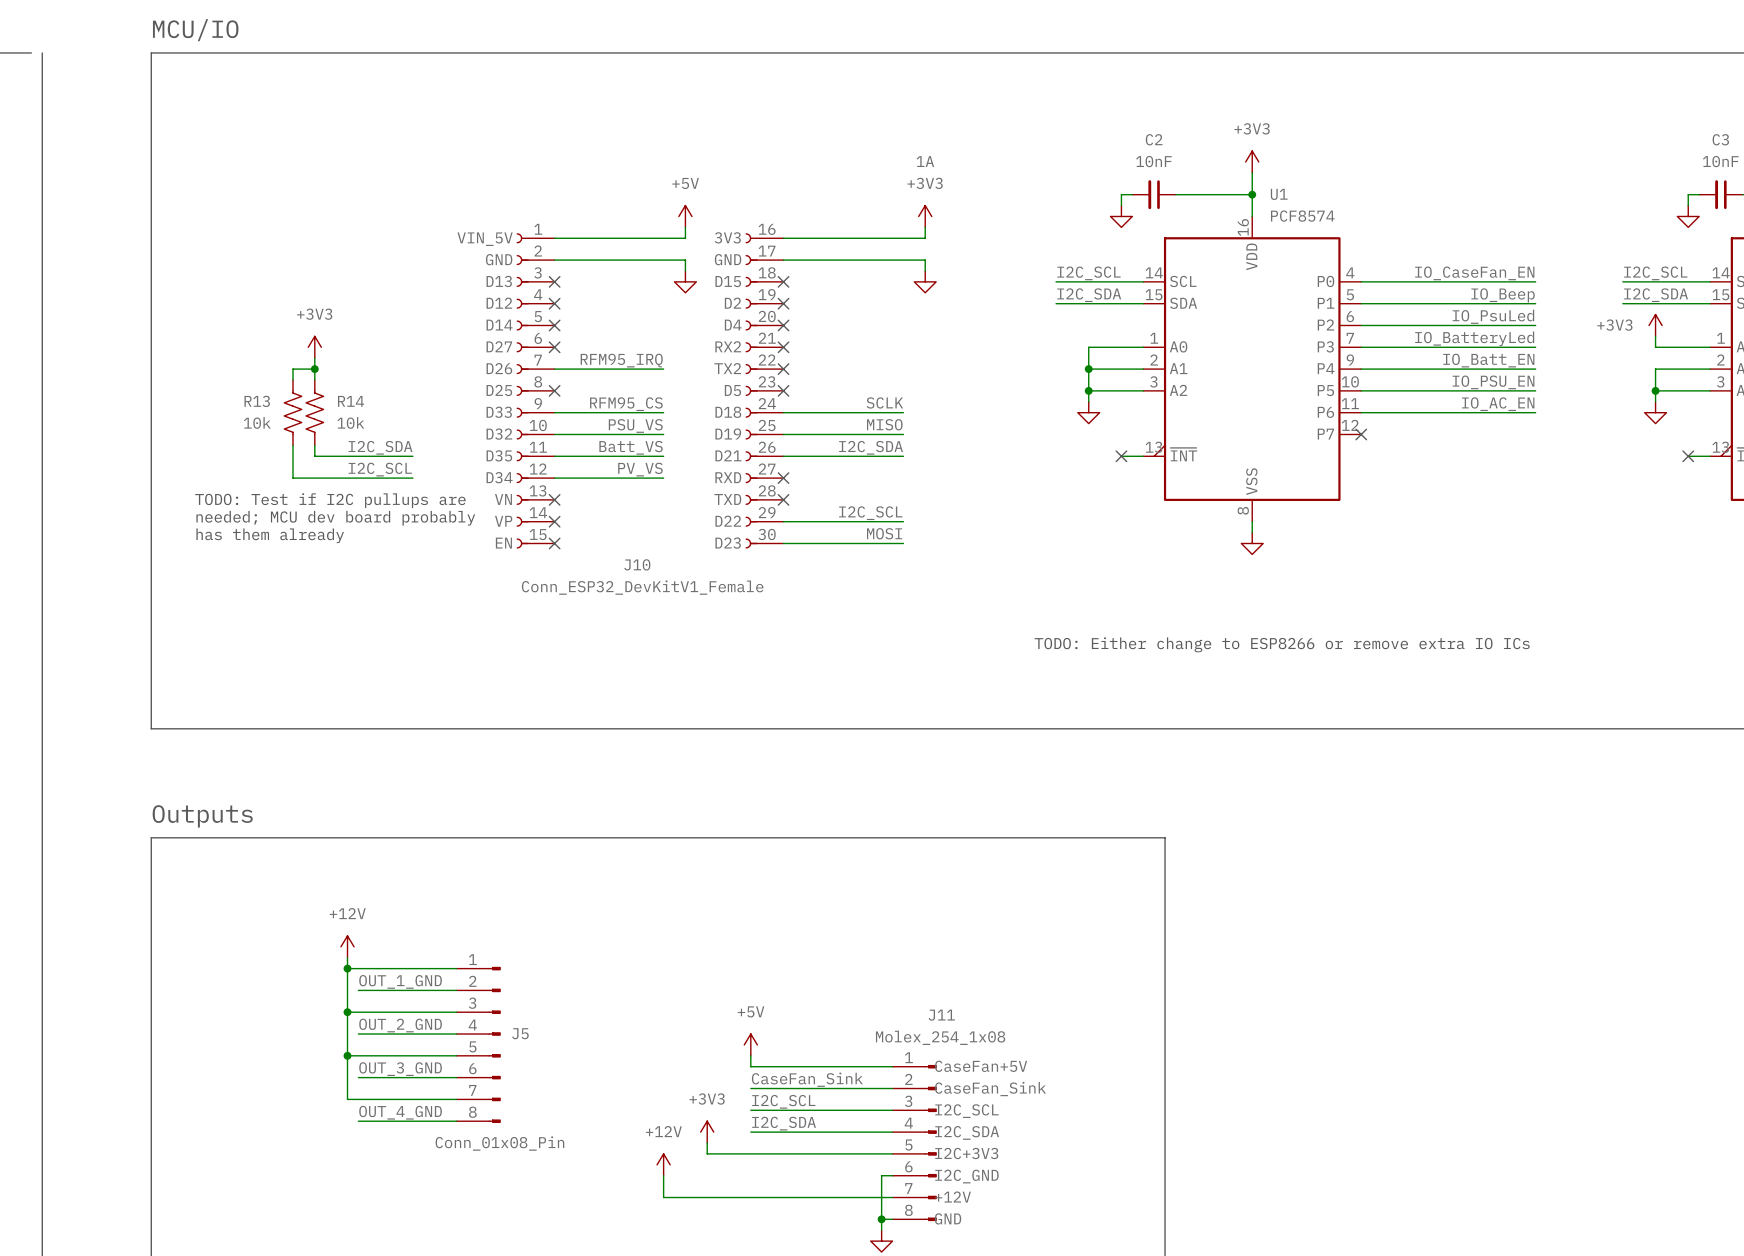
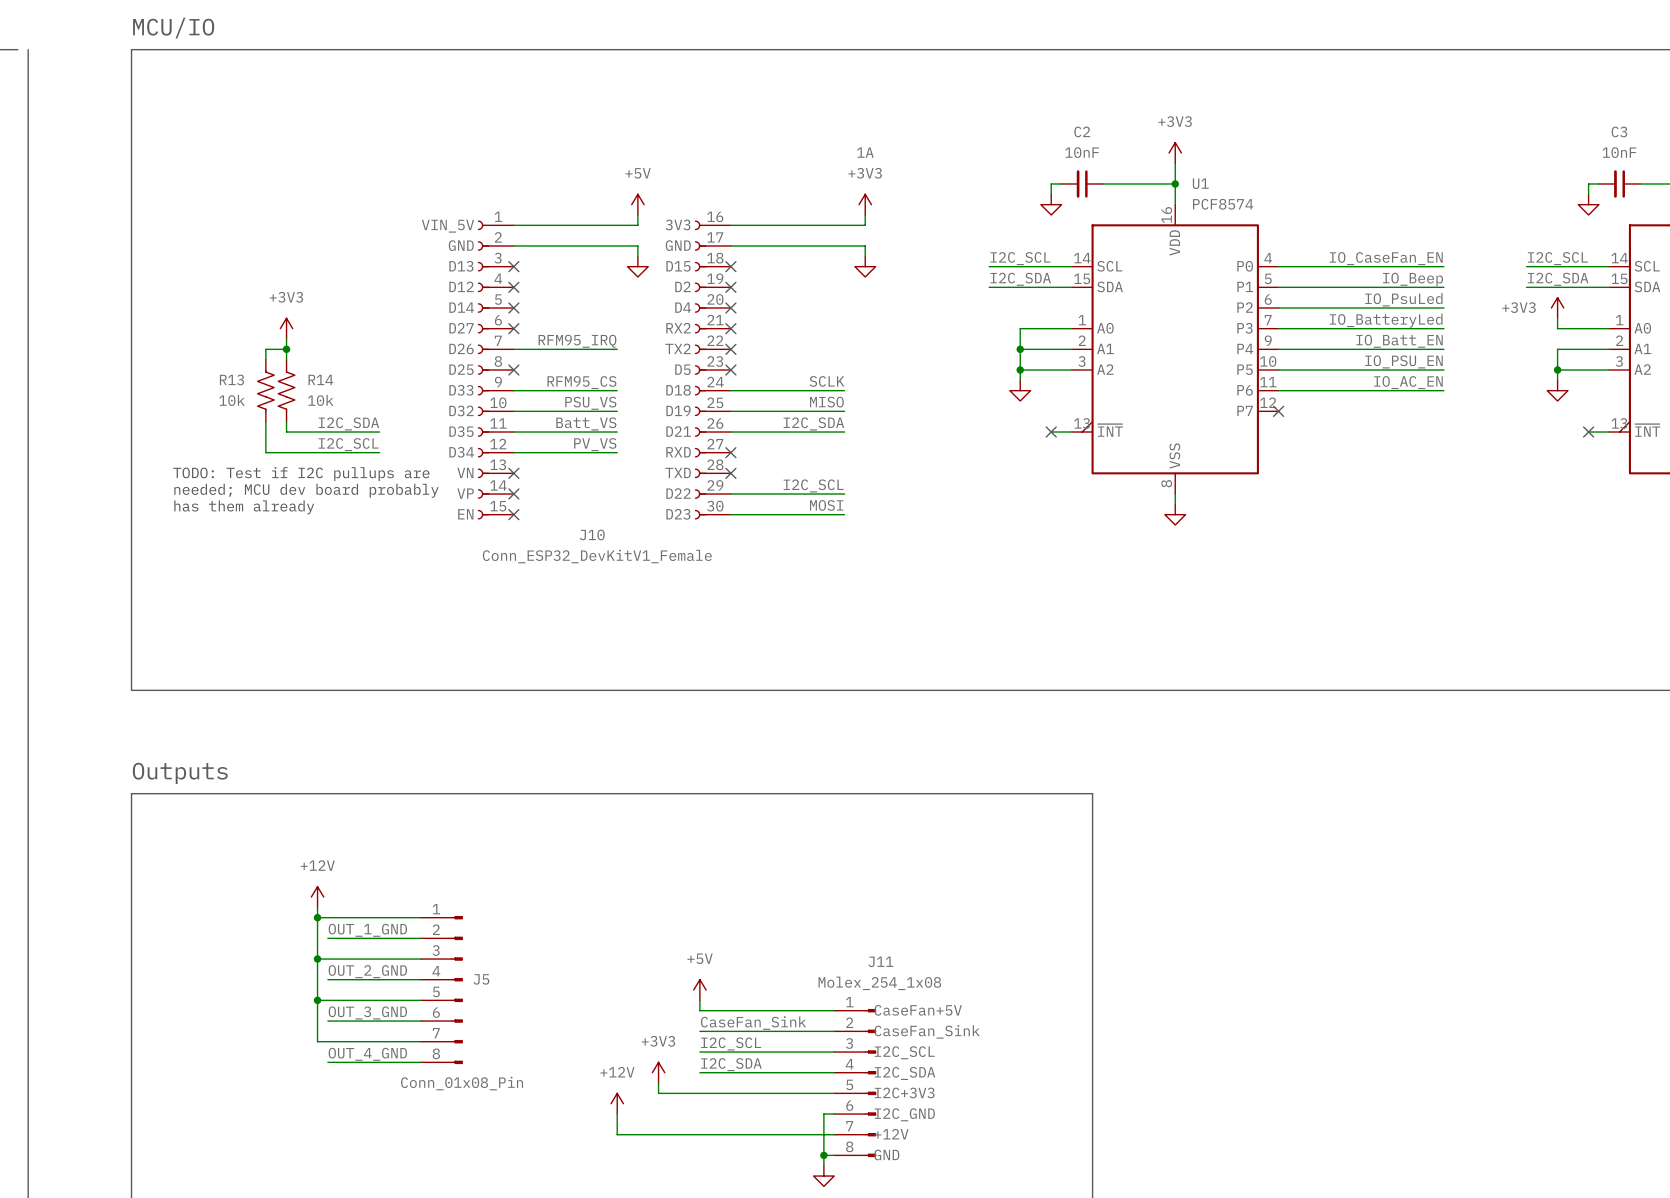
text: TODO: Either change to ESP8266 or remove extra IO ICs (1282, 644) -> none

